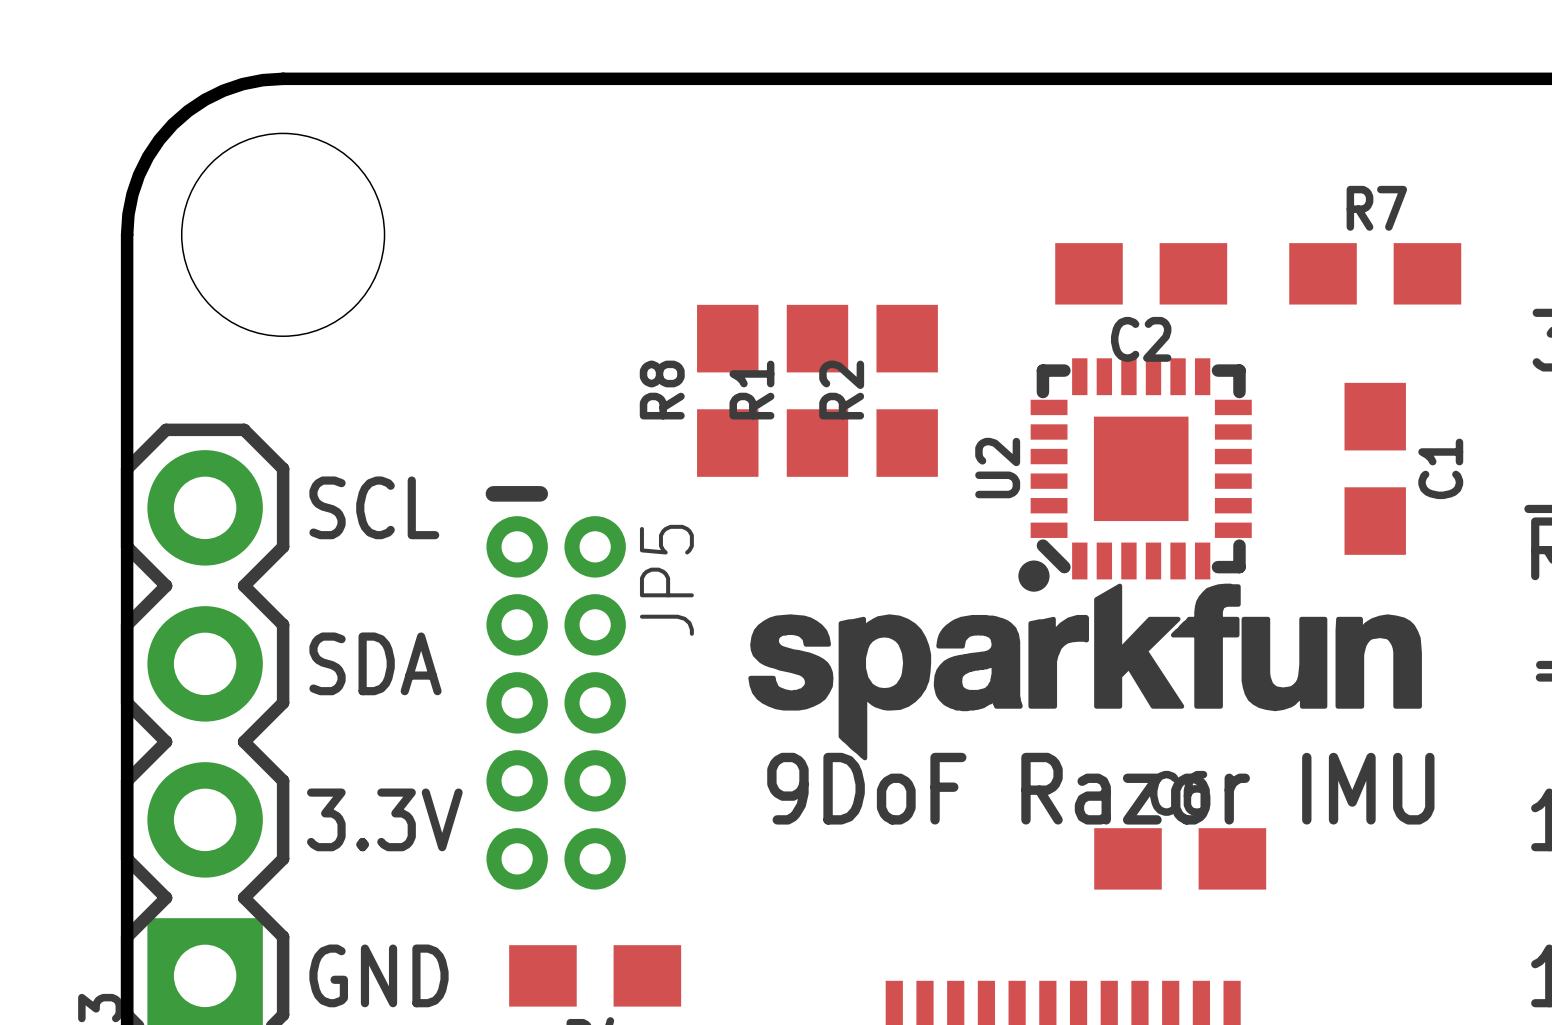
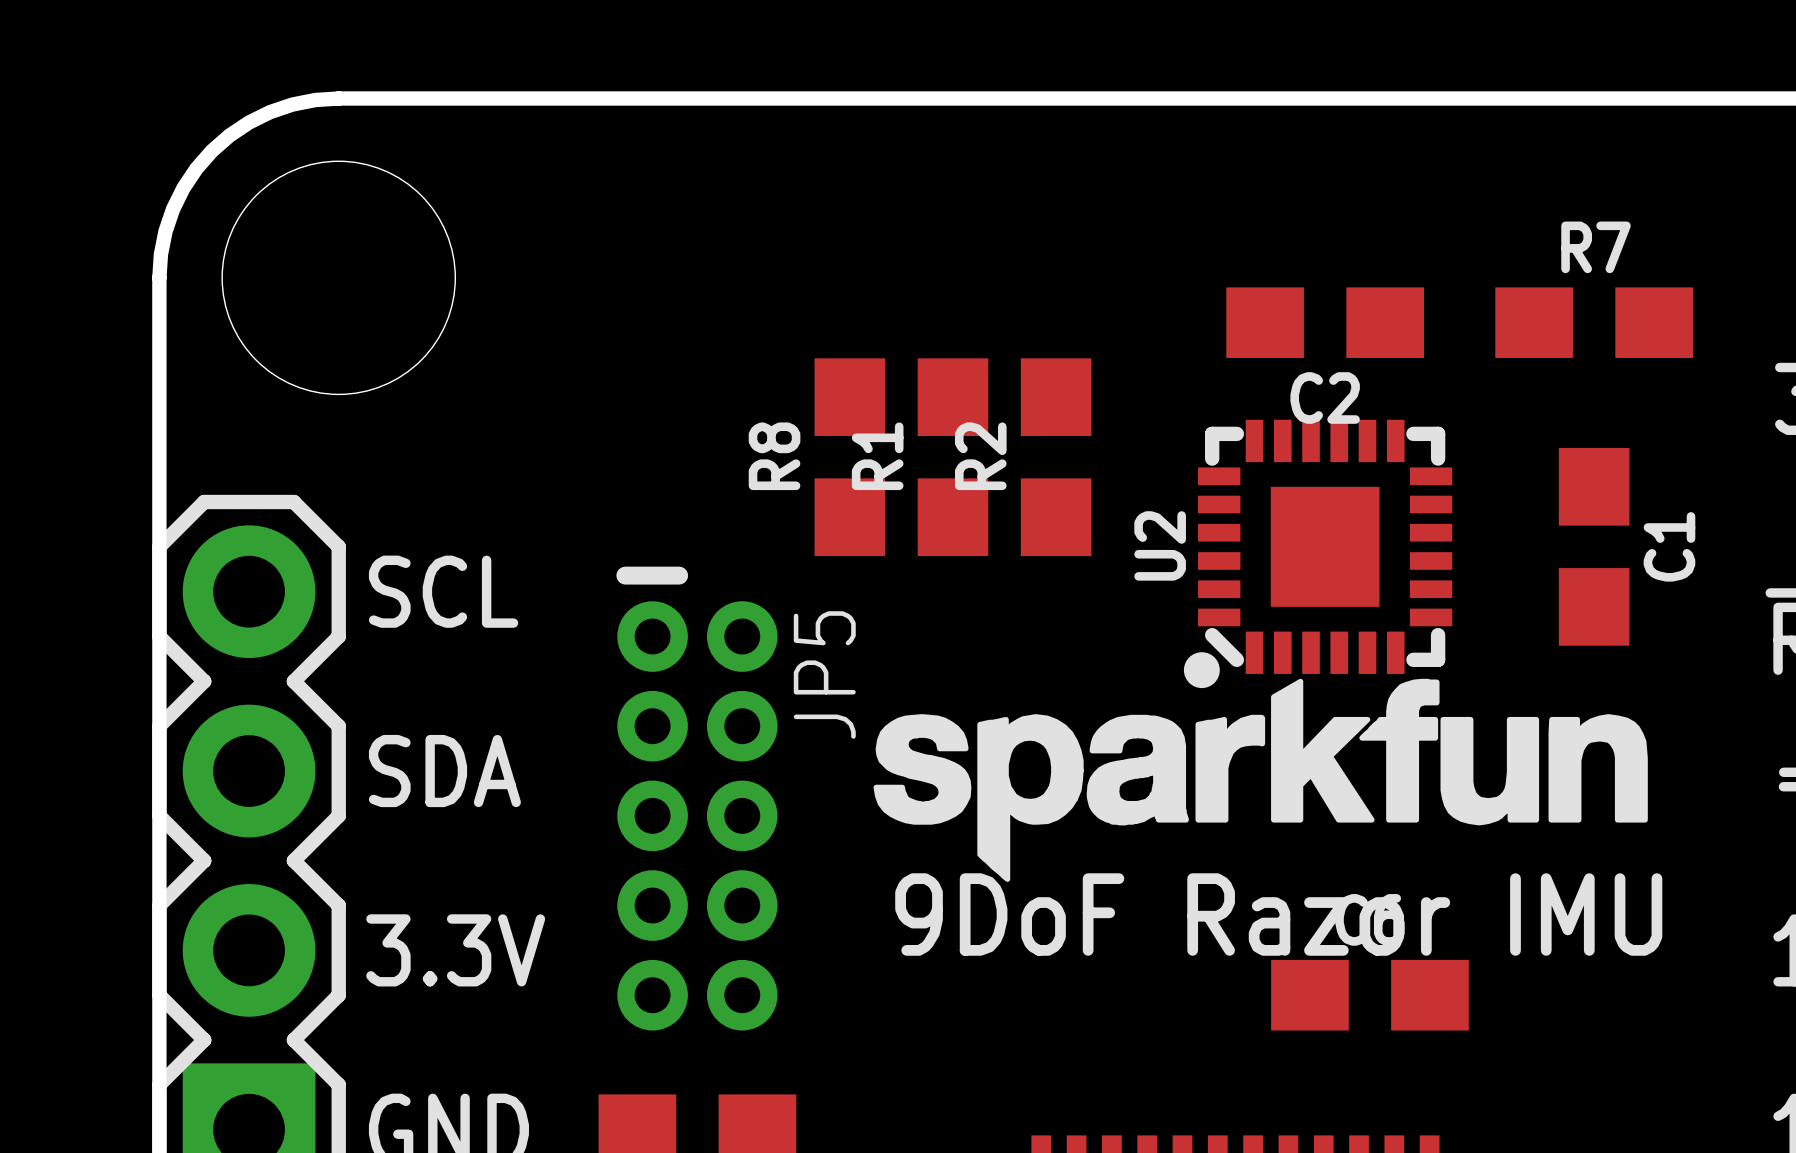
JP5 position: (555, 687) -> (696, 798)

